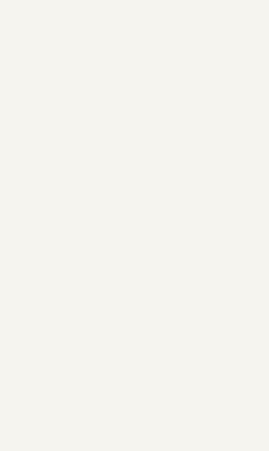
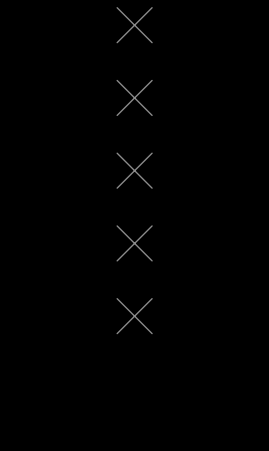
no-connect mark: none -> (134, 25)
no-connect mark: none -> (134, 97)
no-connect mark: none -> (134, 170)
no-connect mark: none -> (134, 243)
no-connect mark: none -> (134, 316)

